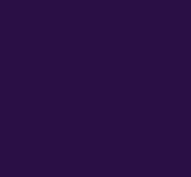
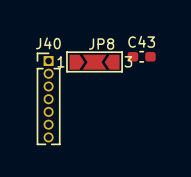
C43: none -> (141, 56)
JP8: none -> (94, 61)
J40: none -> (48, 98)

